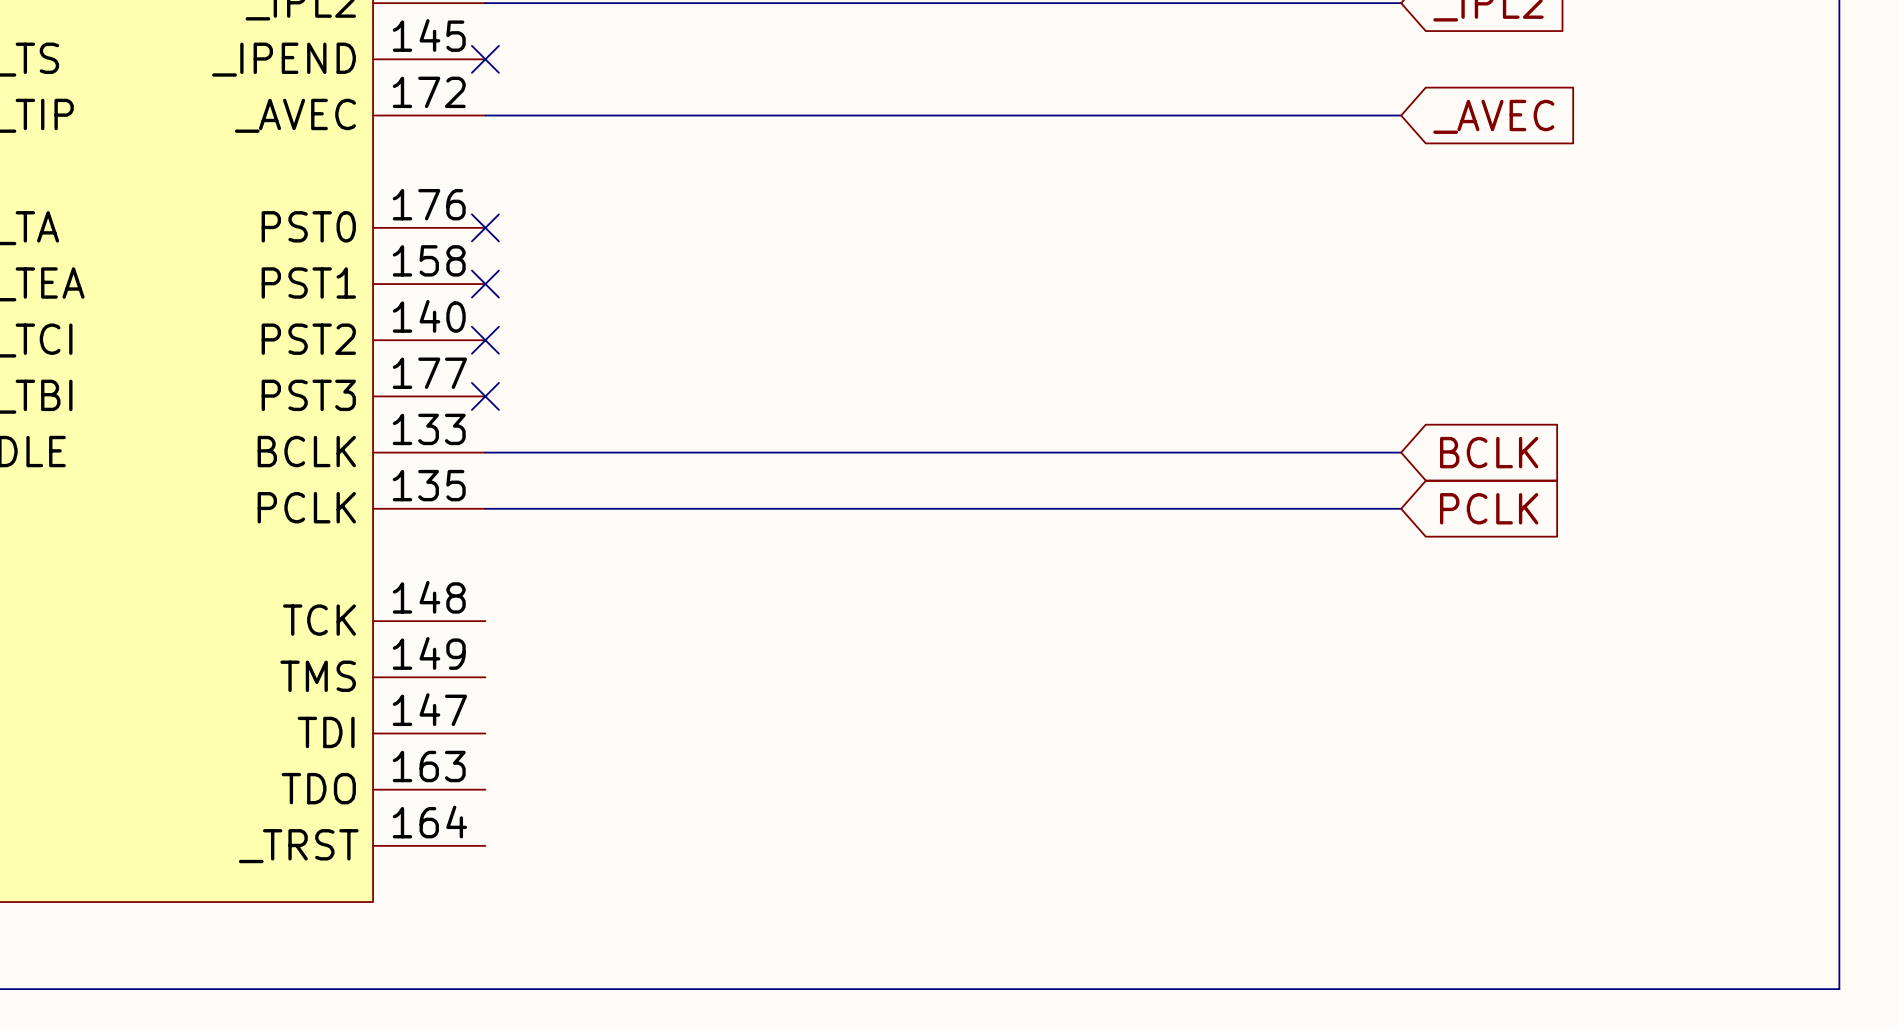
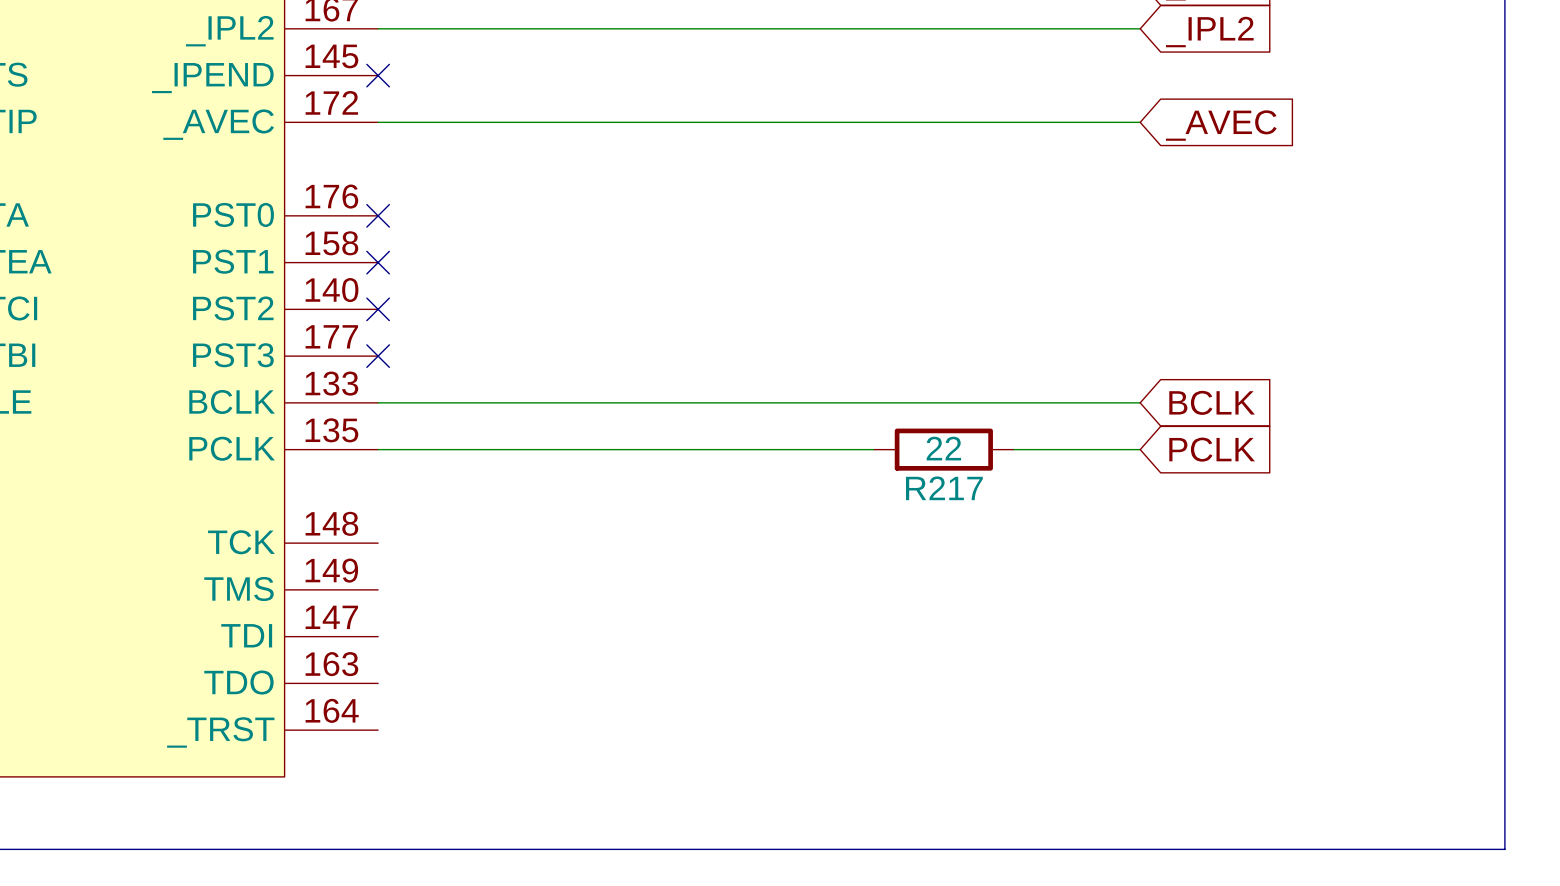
wire: (1080, 508) (1249, 508) -> none
R217: none -> 22 (943, 449)

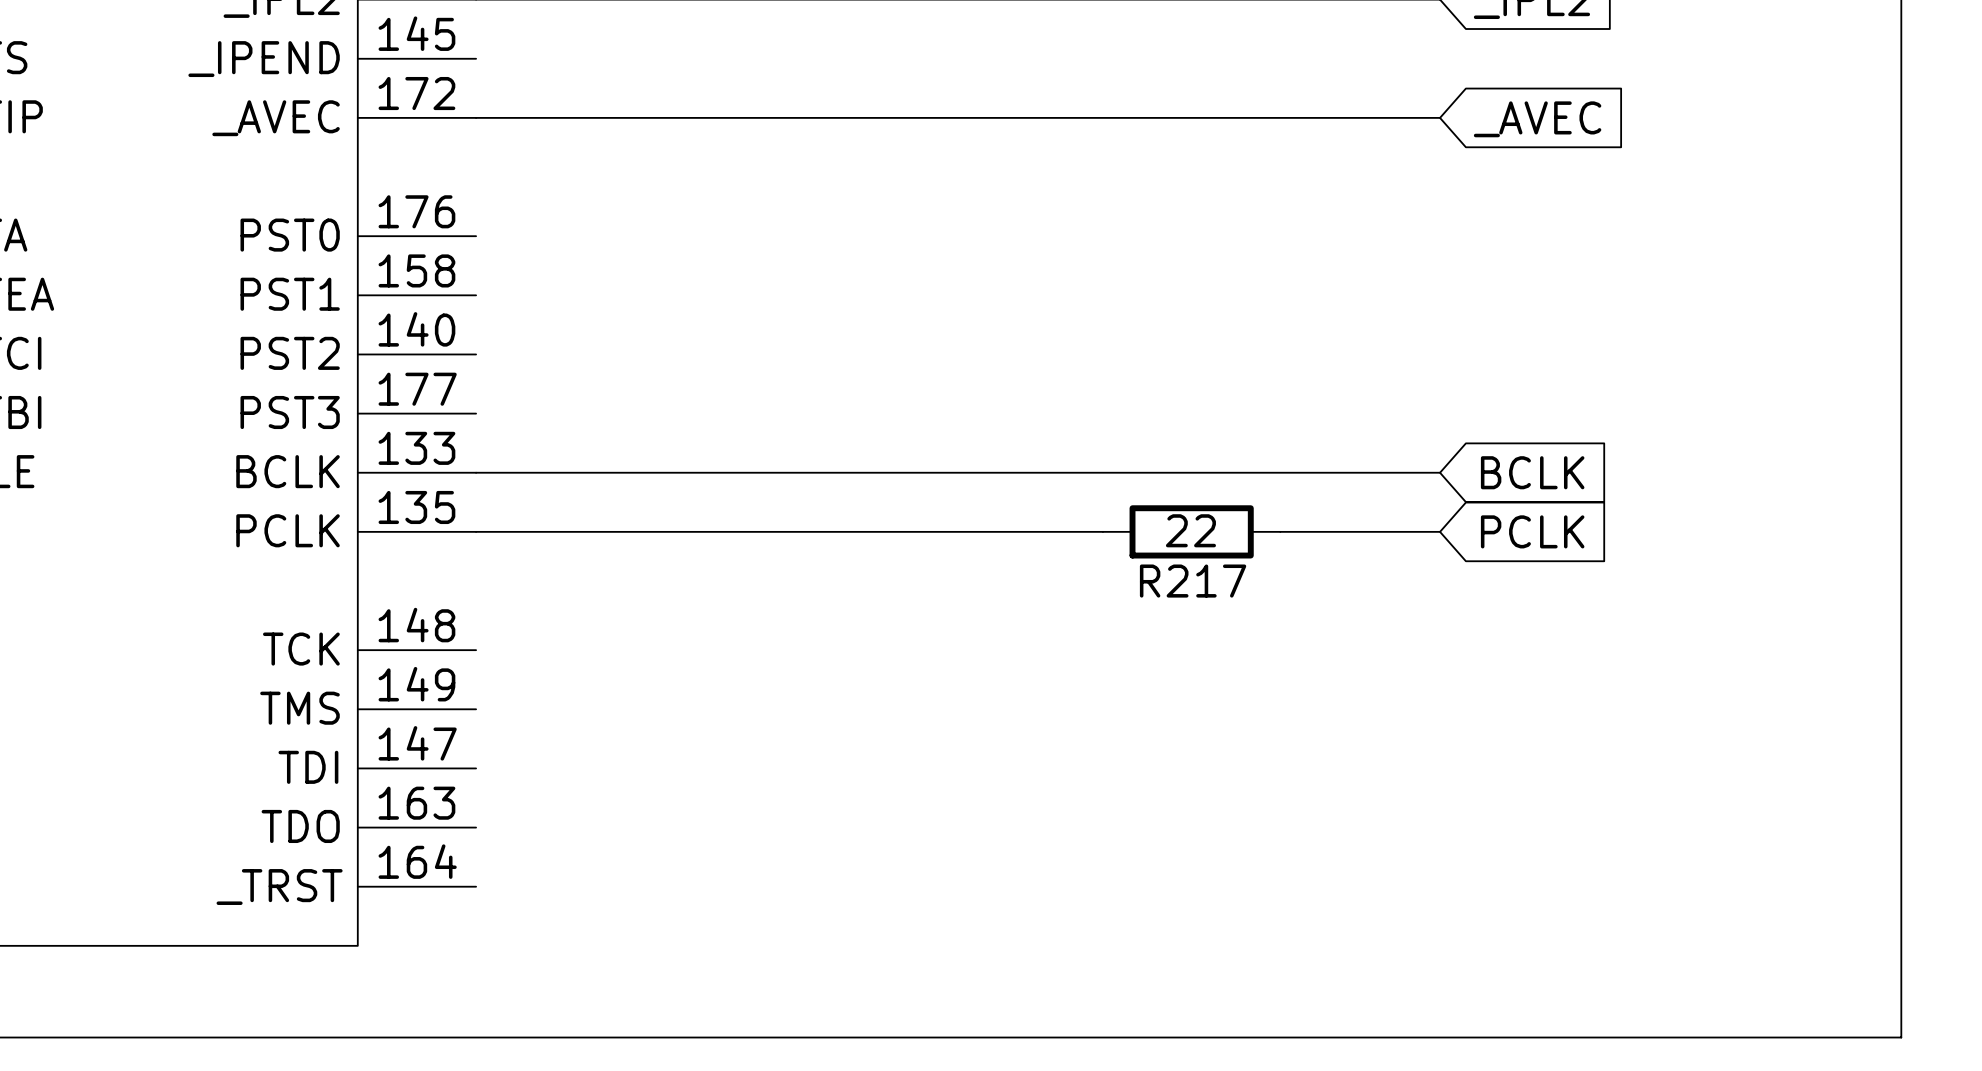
no-connect mark: (378, 75) -> none
no-connect mark: (378, 215) -> none
no-connect mark: (378, 262) -> none
no-connect mark: (378, 309) -> none
no-connect mark: (378, 356) -> none

